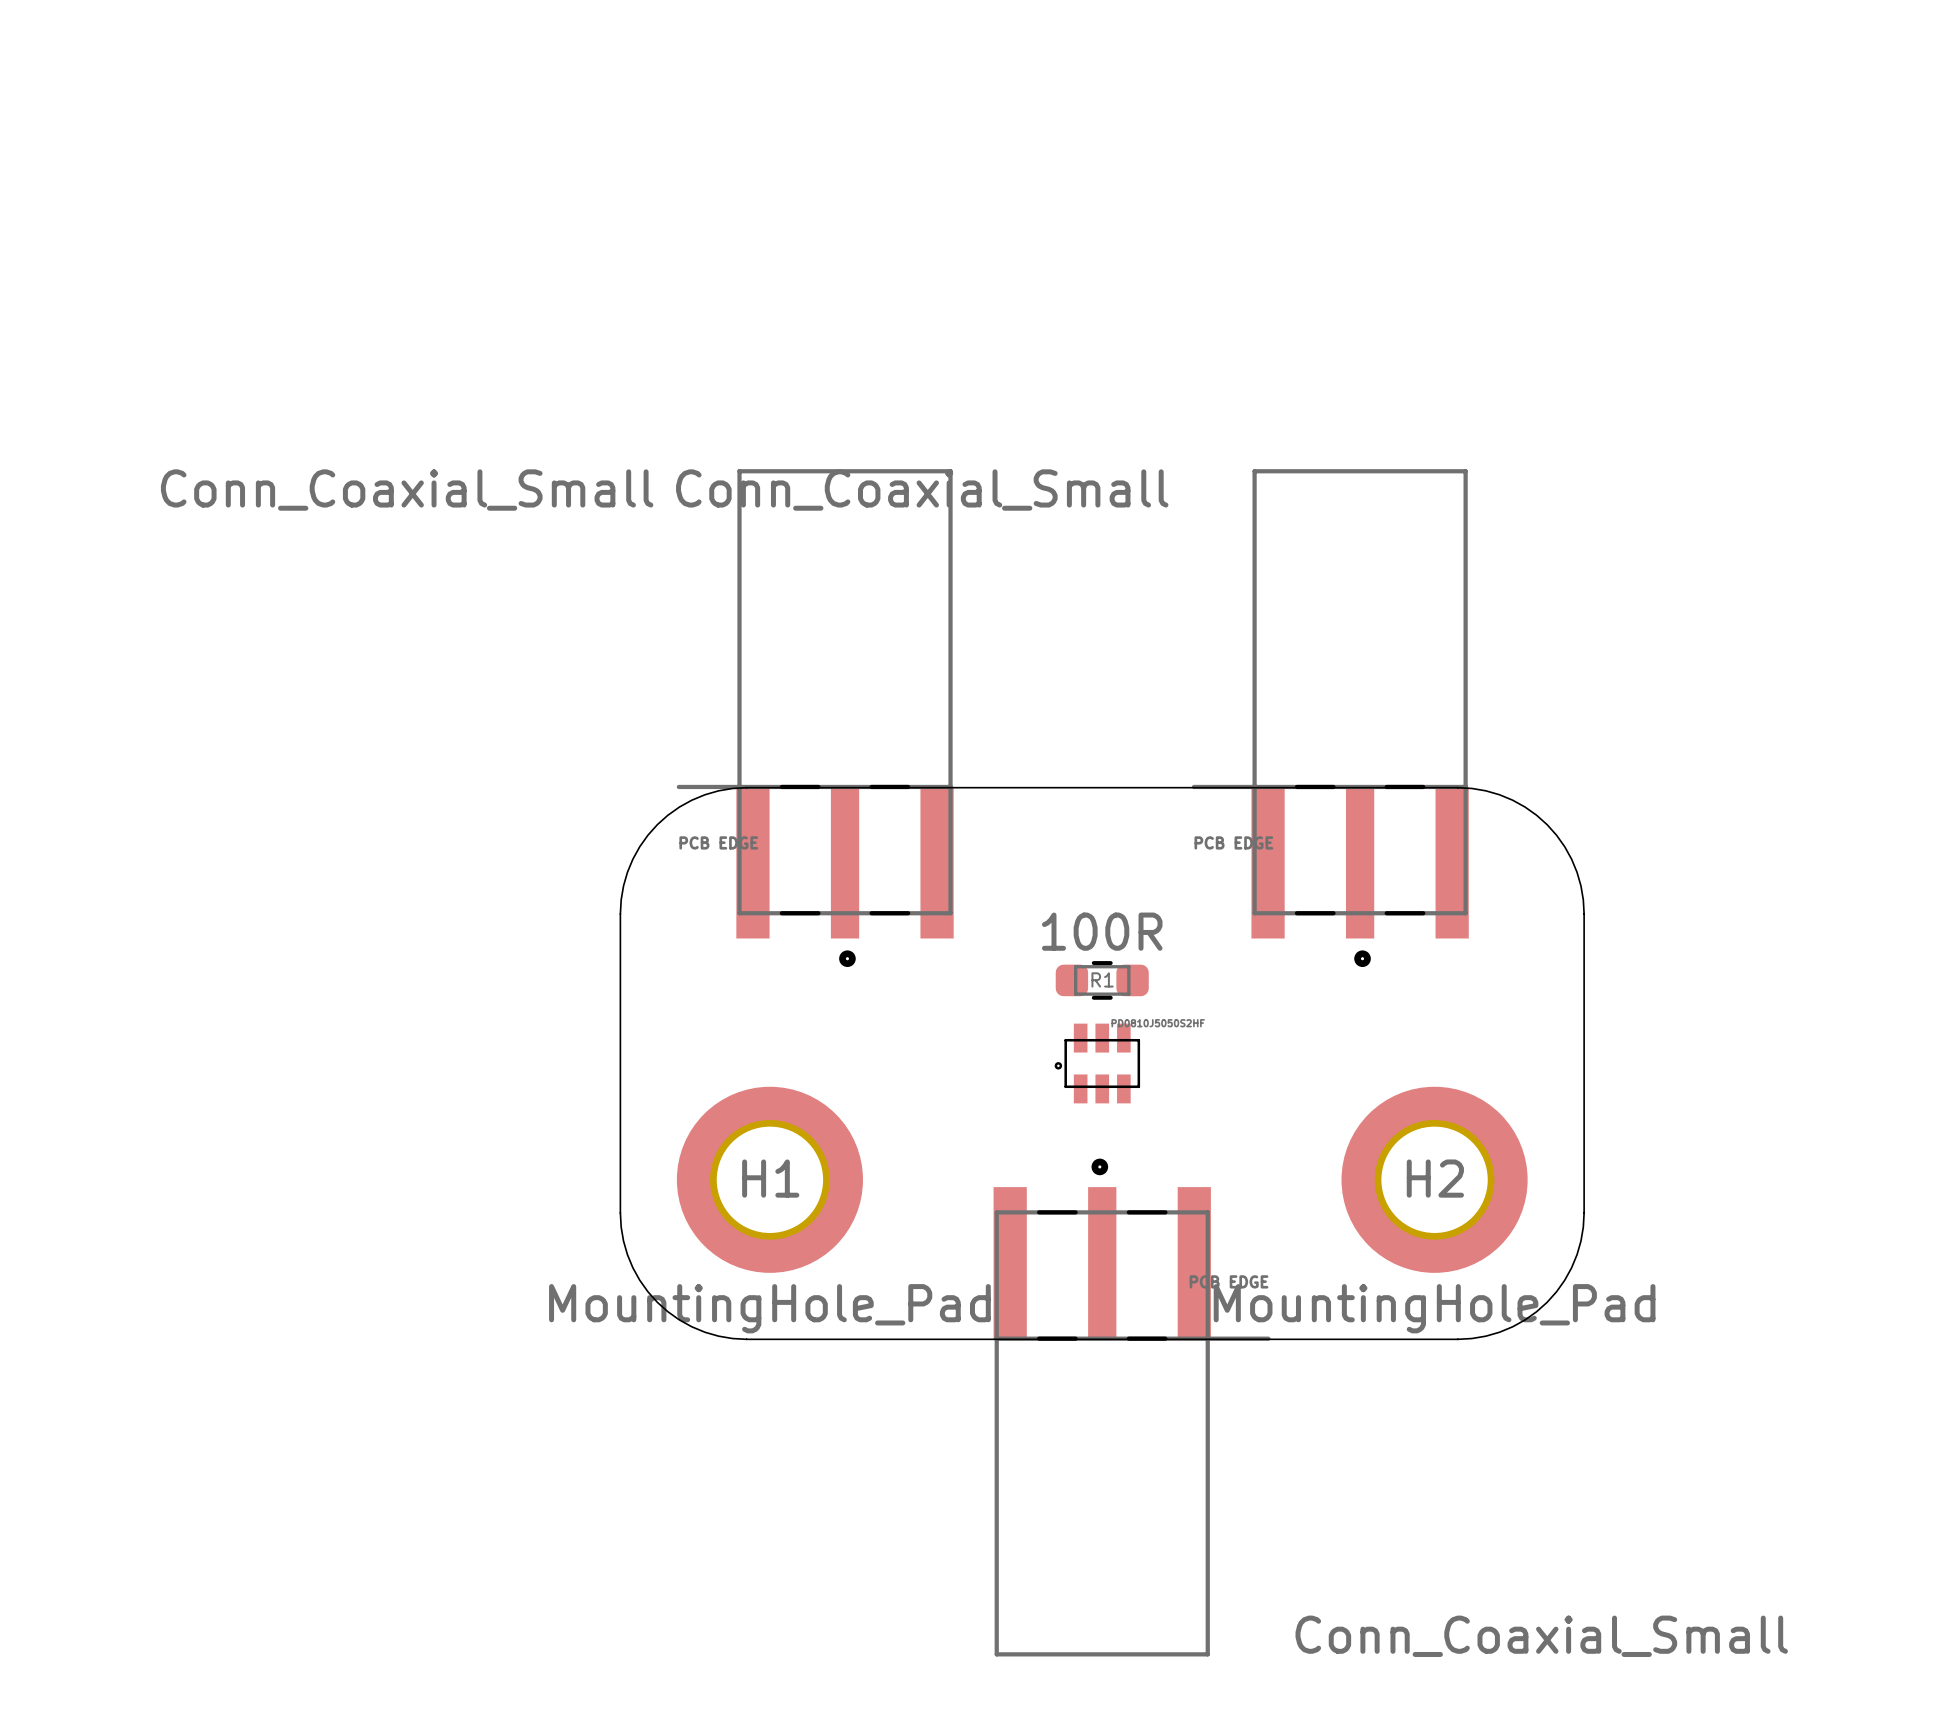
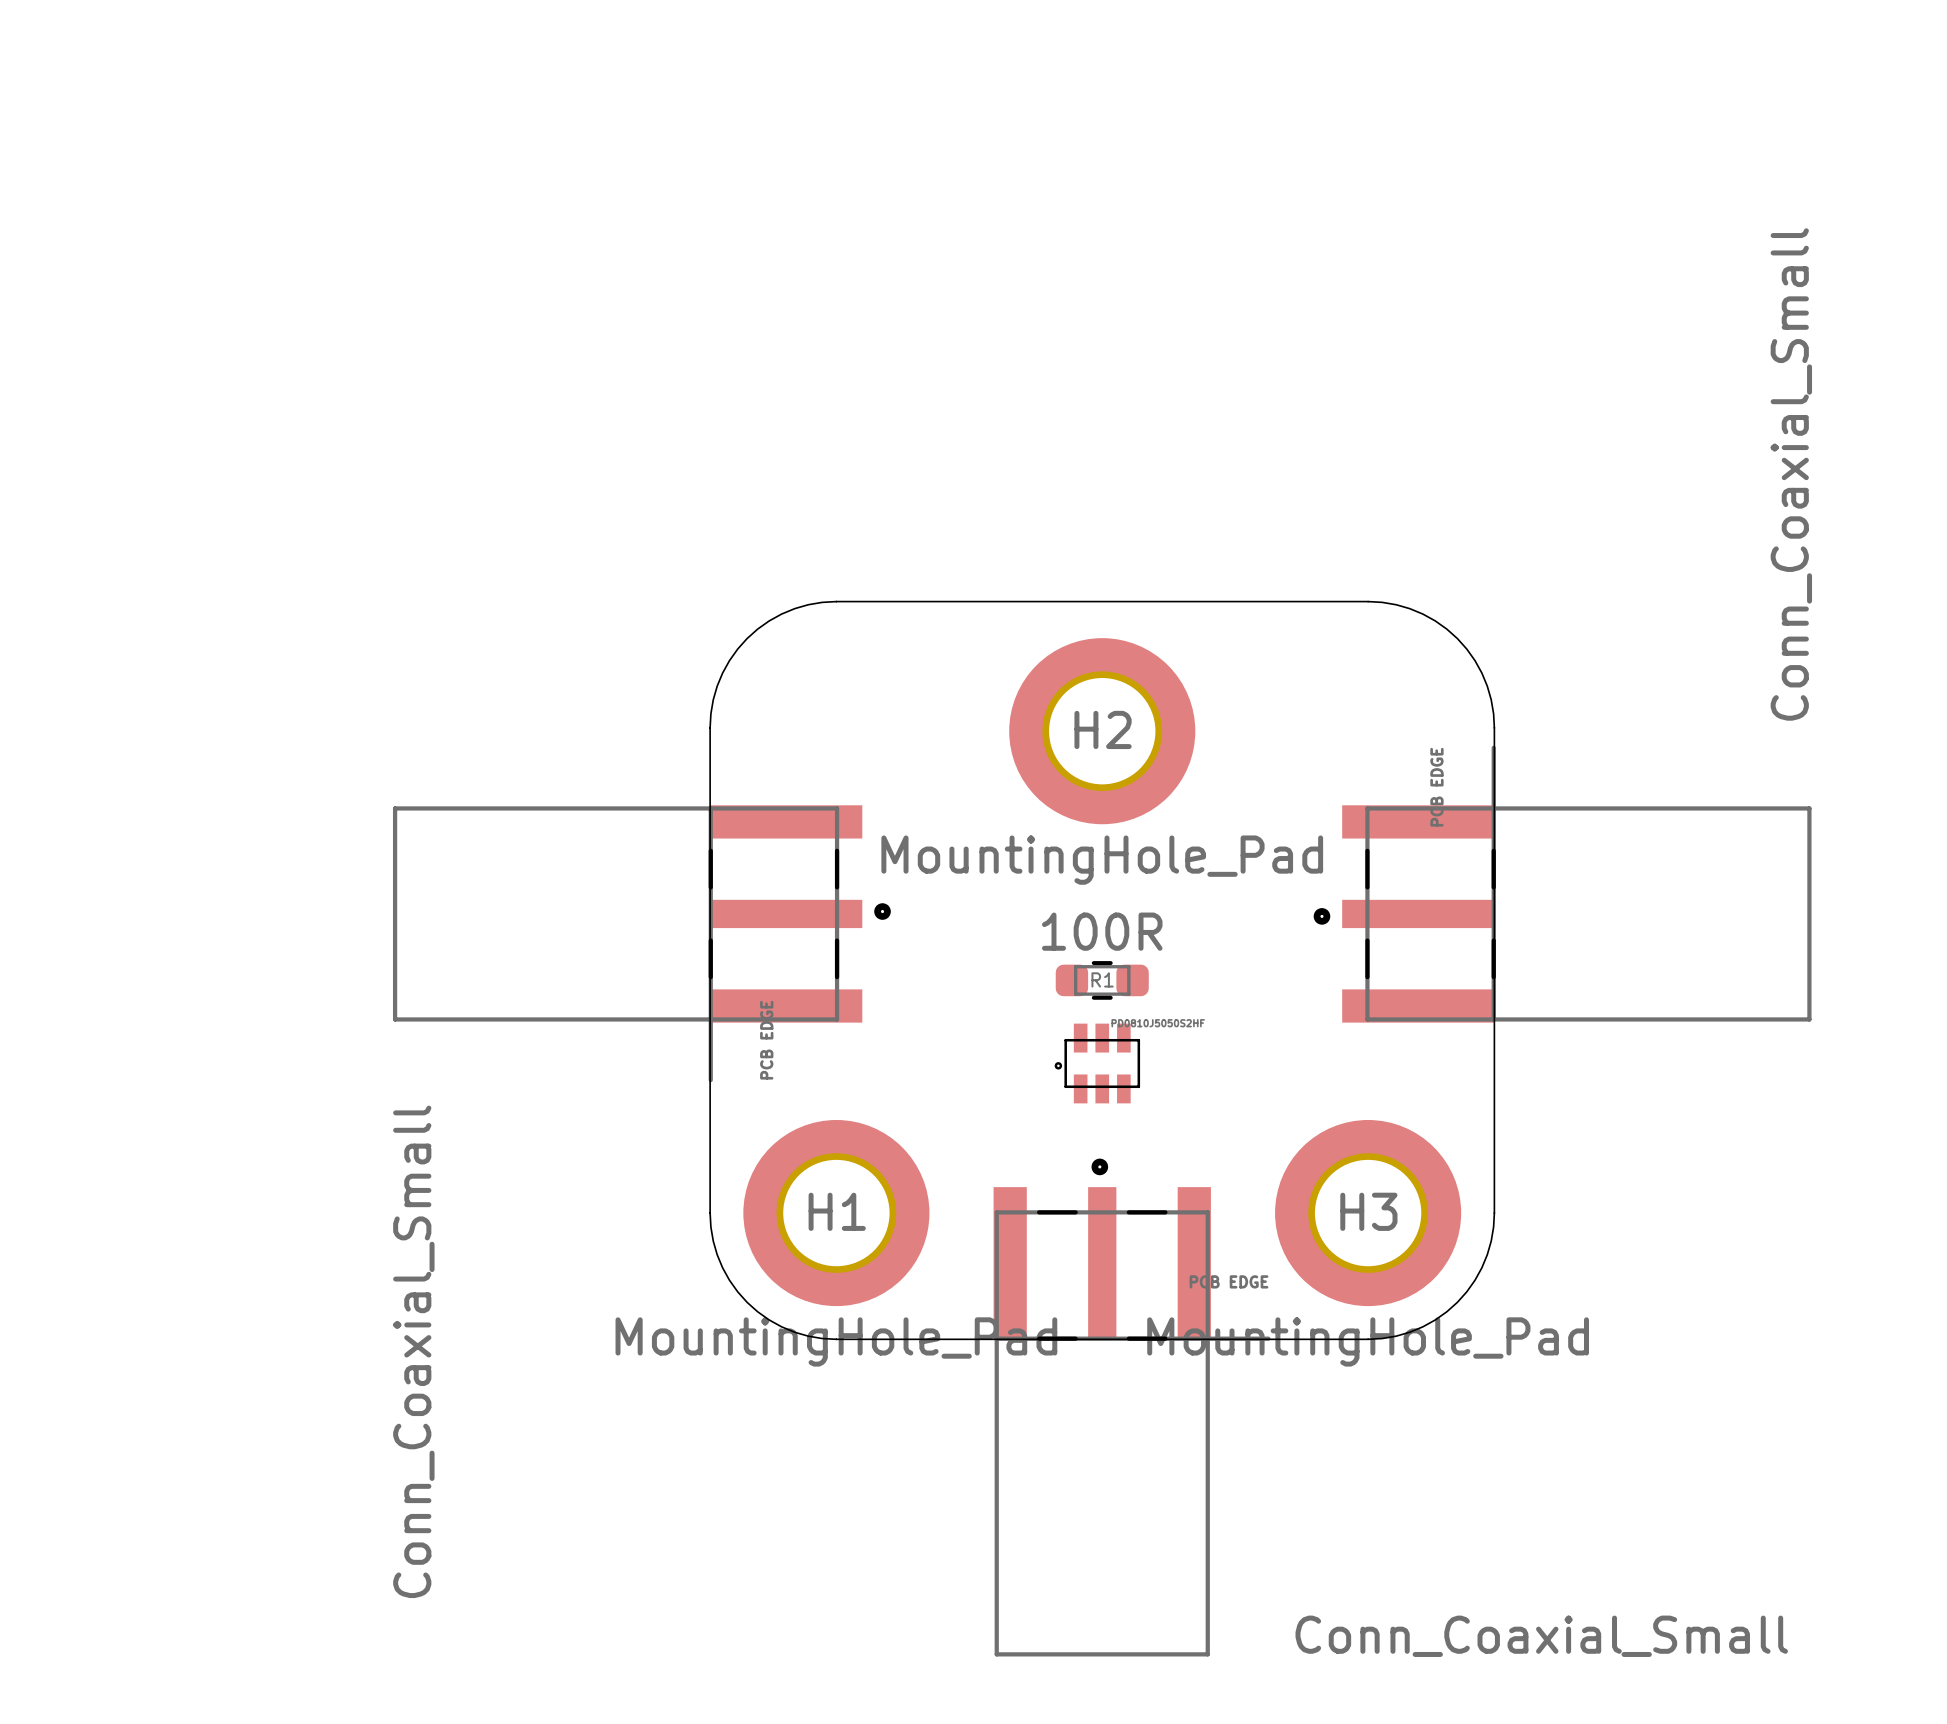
part rotation: 0° (815, 718) -> 90° counterclockwise (641, 943)
part rotation: 0° (1330, 718) -> 90° clockwise (1562, 884)
H1 position: (769, 1179) -> (836, 1213)
H2 position: (1434, 1179) -> (1102, 731)
H3: none -> MountingHole_Pad (1368, 1213)
board edge: (836, 1339) (732, 1338) (718, 1336) (691, 1326) (667, 1311) (647, 1291) (632, 1267) (623, 1241) (620, 1213) (620, 913) (623, 885) (627, 872) (639, 846) (657, 824) (679, 807) (704, 794) (718, 790) (746, 787) (1457, 787) (1471, 788) (1499, 794) (1512, 800) (1536, 815) (1556, 835) (1571, 859) (1577, 872) (1583, 899) (1584, 1213) (1583, 1227) (1577, 1254) (1564, 1280) (1547, 1302) (1525, 1319) (1499, 1332) (1485, 1336) (1457, 1339) (1368, 1339) -> (836, 1339) (808, 1336) (781, 1326) (757, 1311) (747, 1302) (729, 1280) (717, 1254) (710, 1227) (710, 1213) (710, 727) (713, 699) (722, 673) (729, 660) (747, 638) (757, 629) (769, 620) (794, 608) (808, 604) (836, 601) (1382, 602) (1396, 604) (1422, 614) (1446, 629) (1466, 649) (1475, 660) (1487, 686) (1491, 699) (1494, 727) (1493, 1227) (1487, 1254) (1481, 1267) (1466, 1291) (1446, 1311) (1435, 1319) (1409, 1332) (1382, 1338) (1368, 1339)

